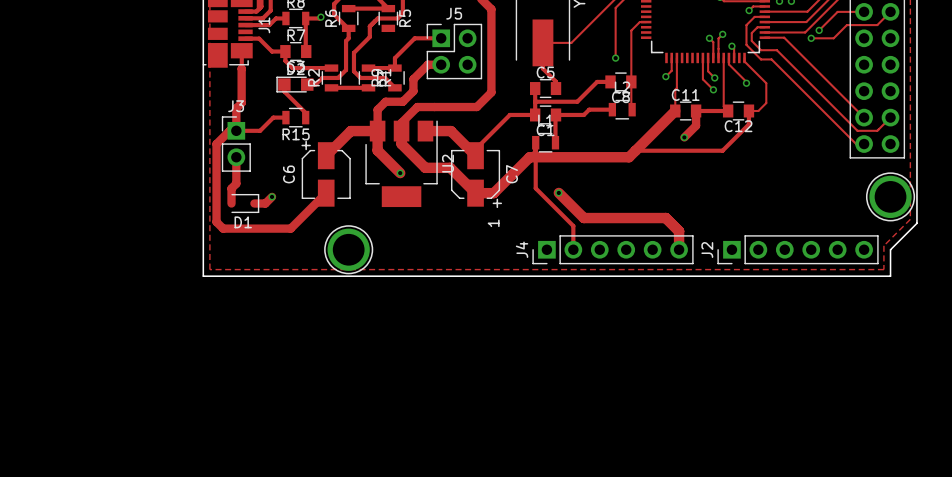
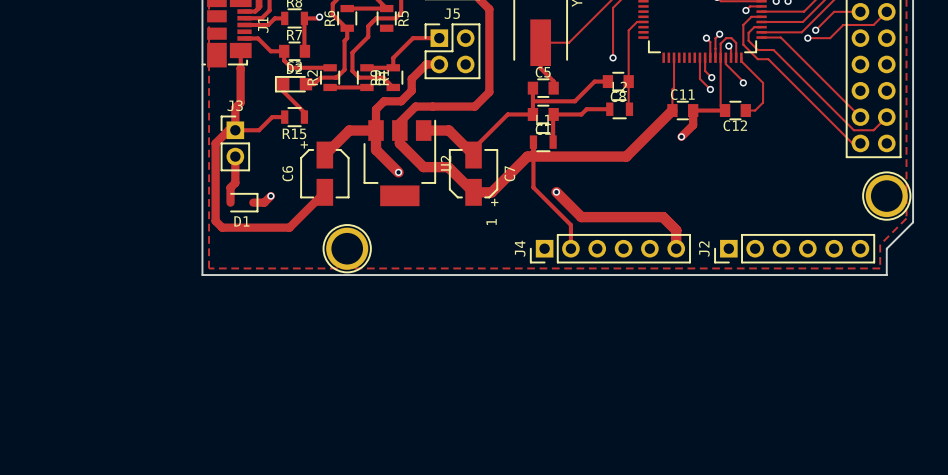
track: (671, 57) (671, 70) (665, 76) -> none
track: none -> (720, 57) (720, 43) (726, 38) (731, 38) (736, 42) (736, 57)
via: (665, 76) -> none
track: (748, 110) (748, 124) (722, 150) (635, 150) -> none

